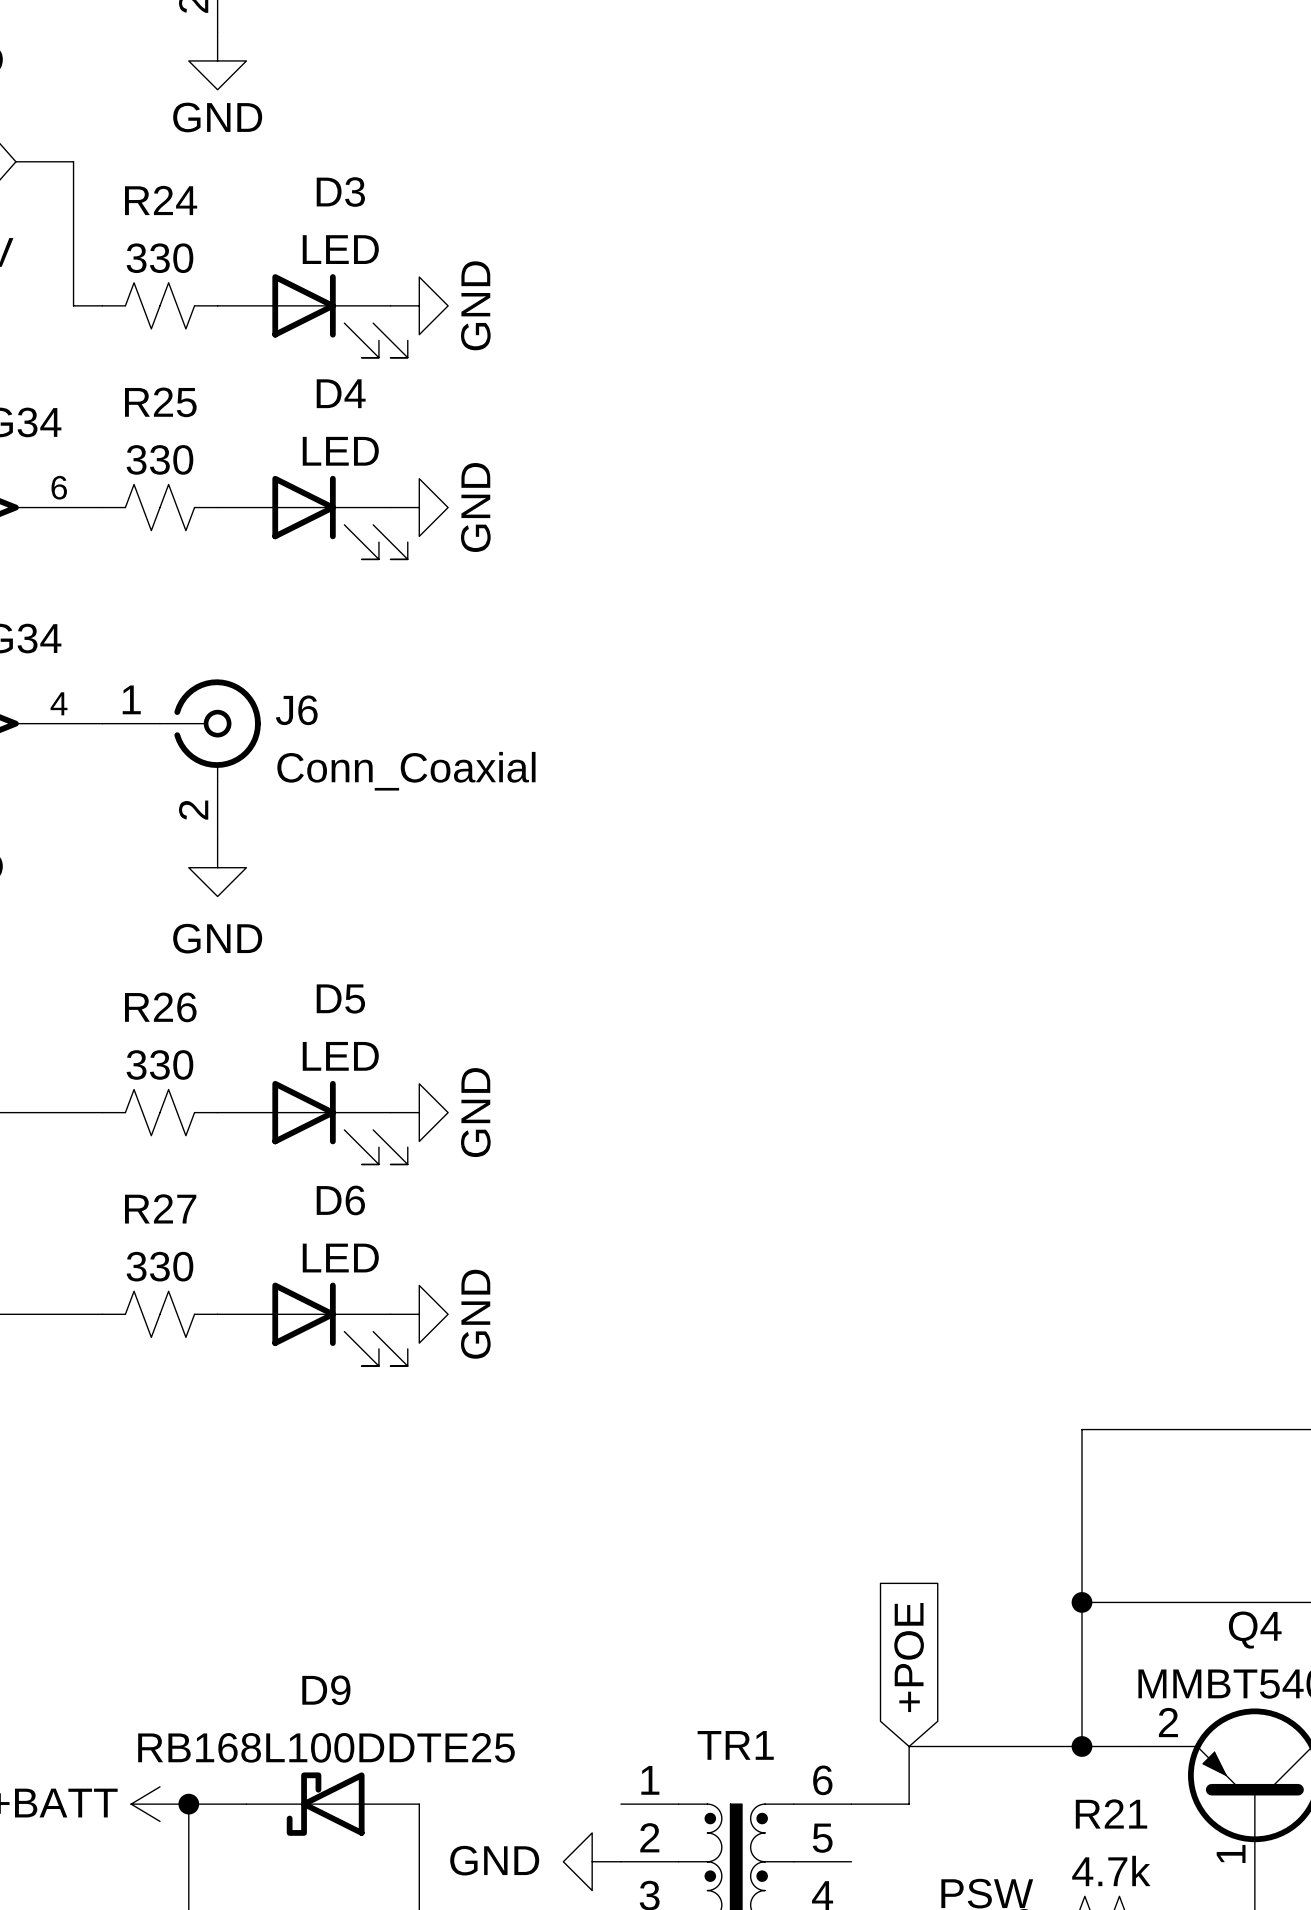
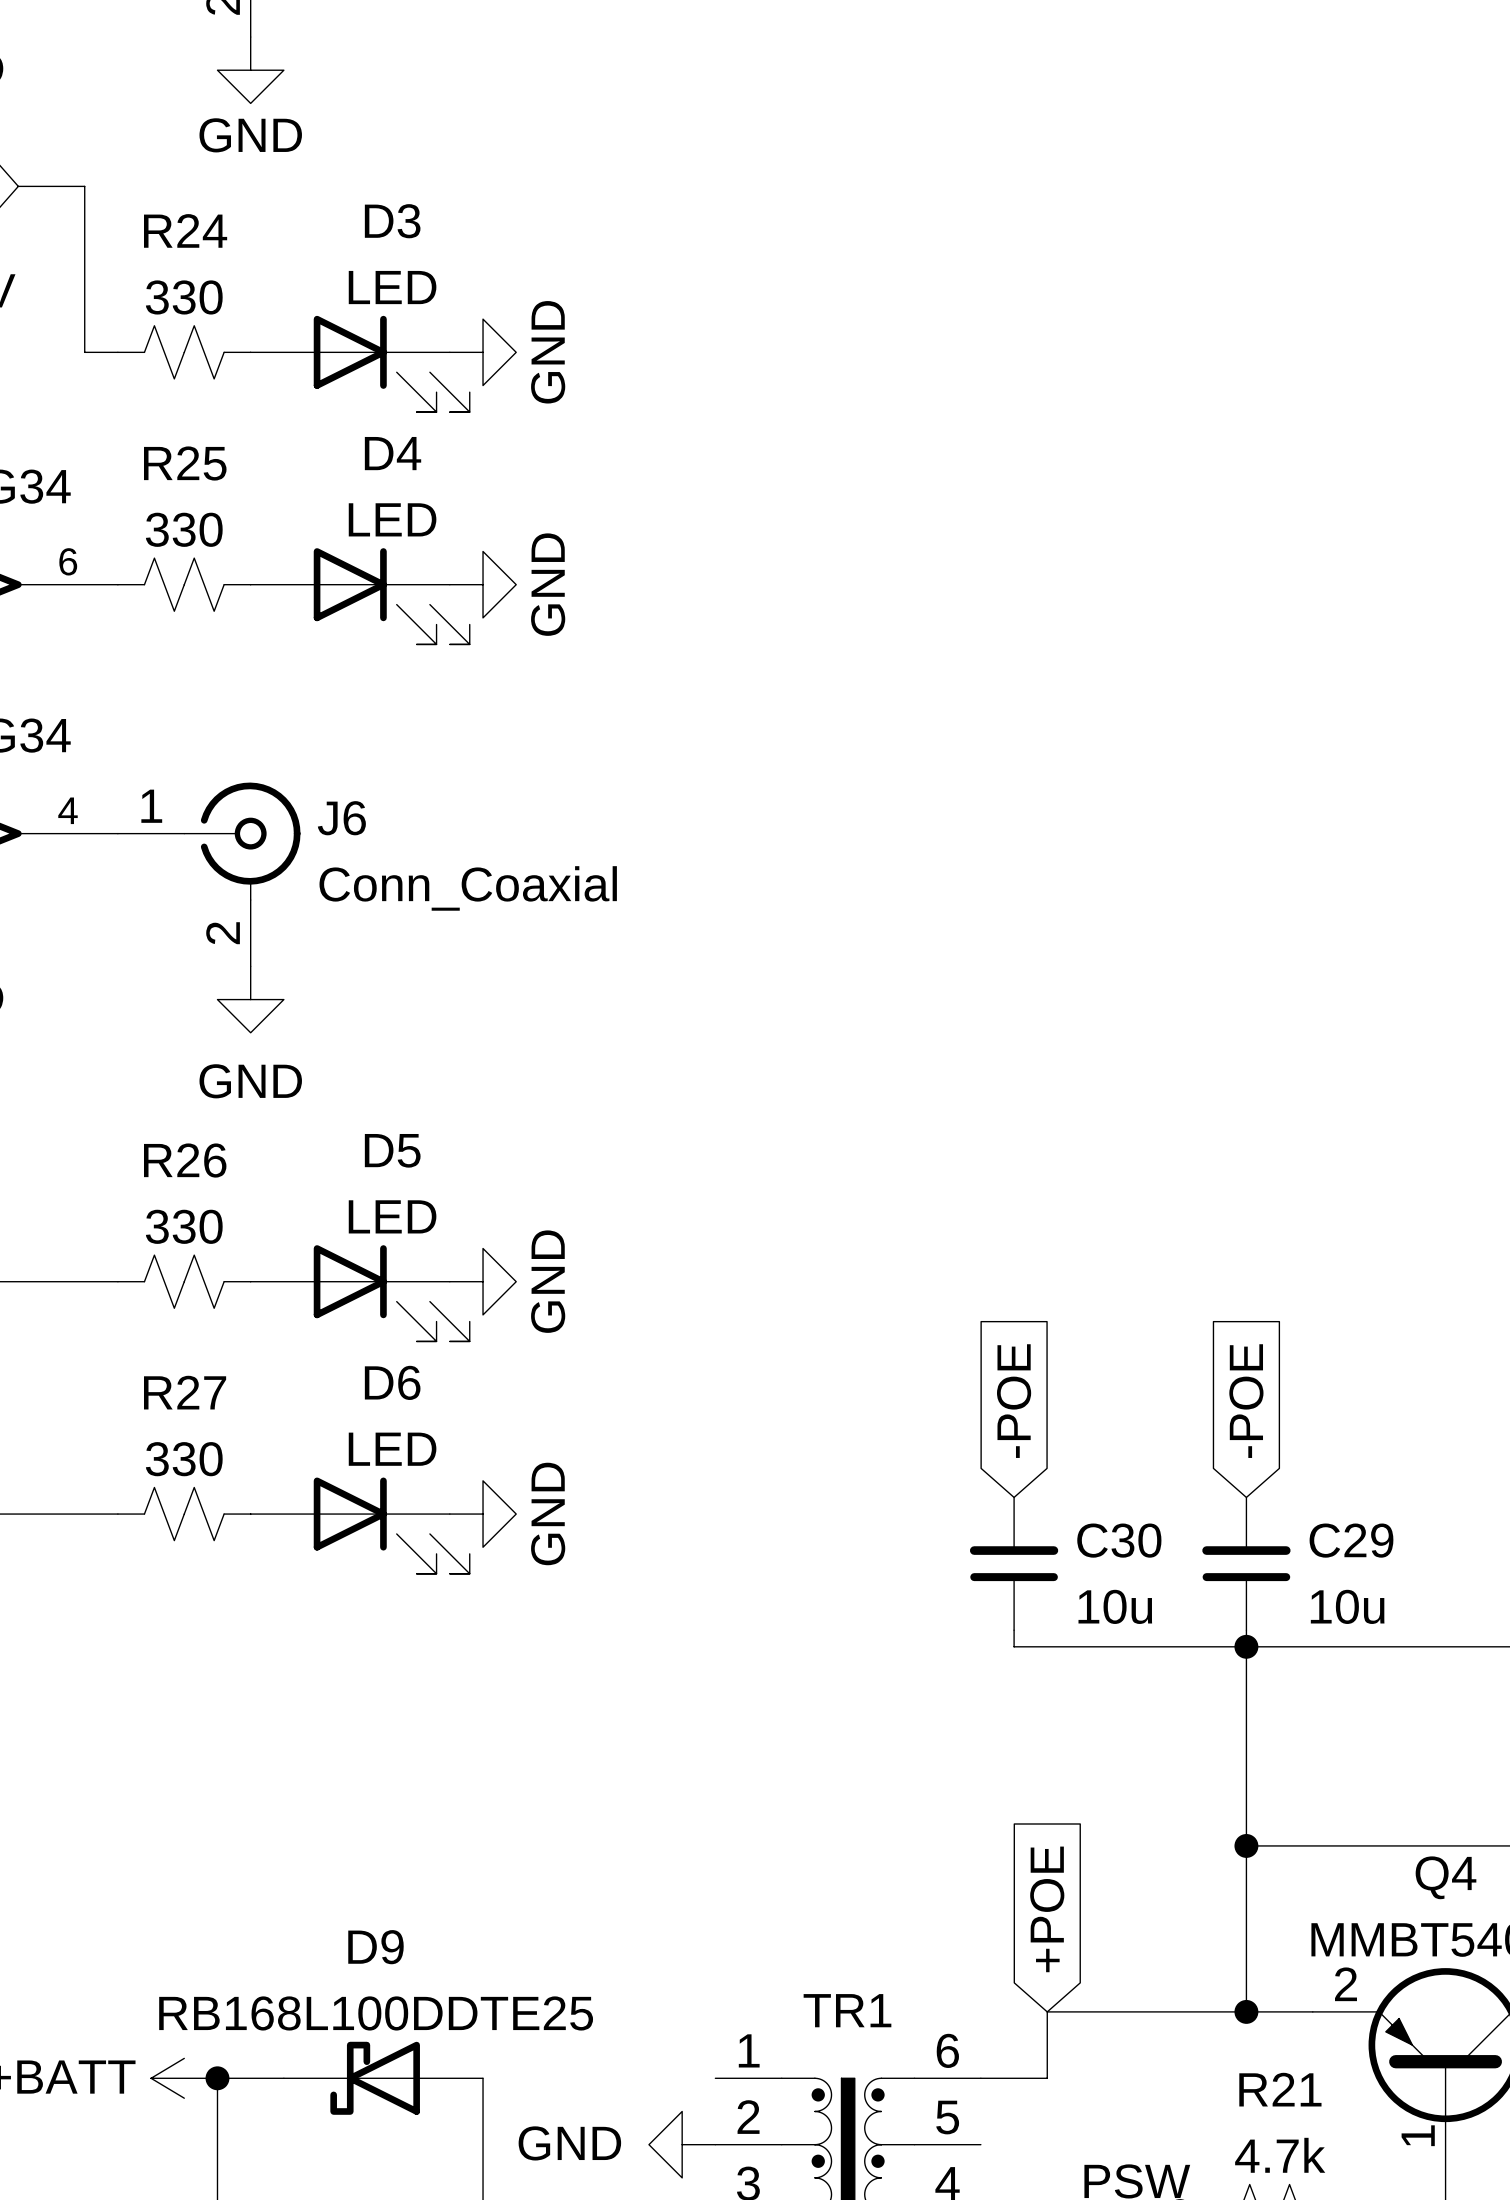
global label: none -> -POE (1014, 1401)
global label: none -> -POE (1246, 1401)
C30: none -> 10u (1014, 1563)
C29: none -> 10u (1246, 1563)
wire: none -> (1014, 1630) (1014, 1646) (1246, 1646) (1246, 1630)
junction: none -> (1246, 1646)

